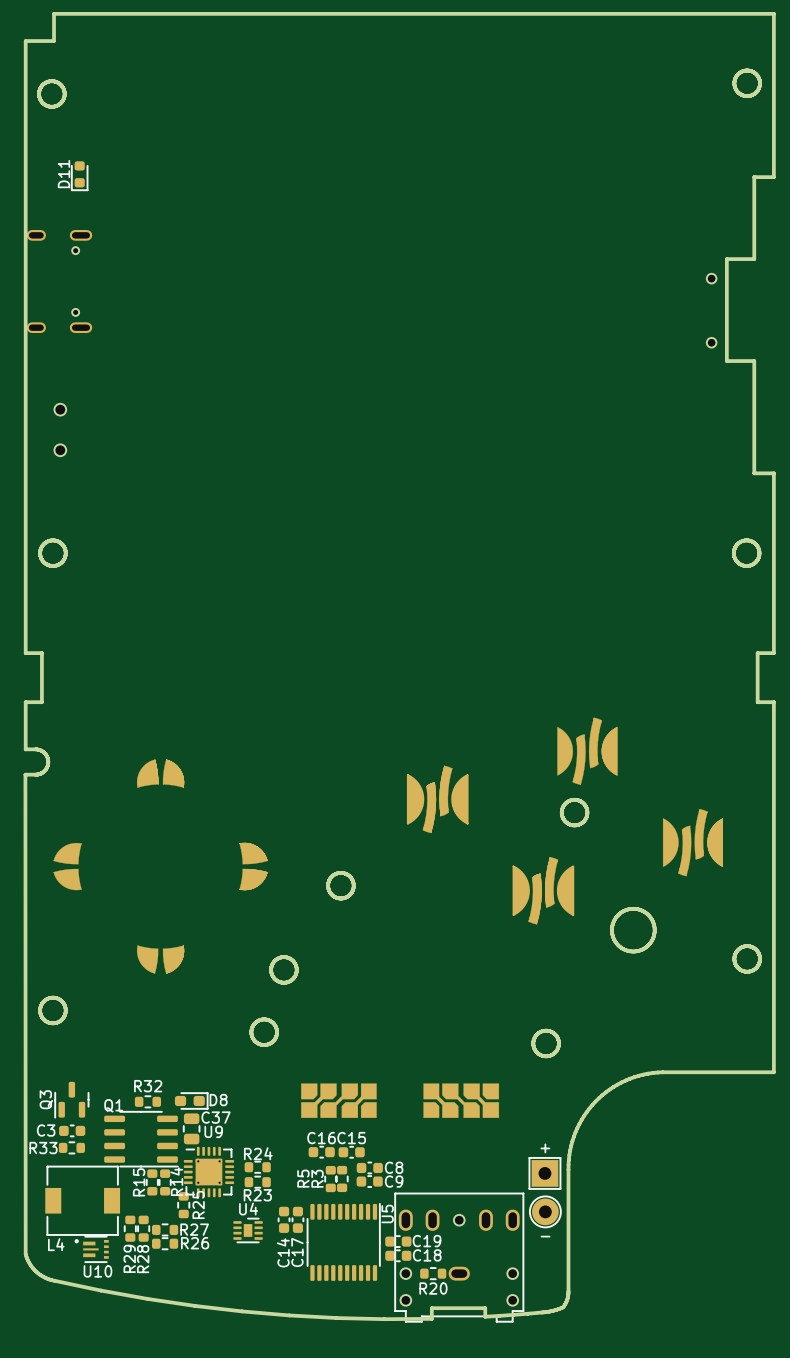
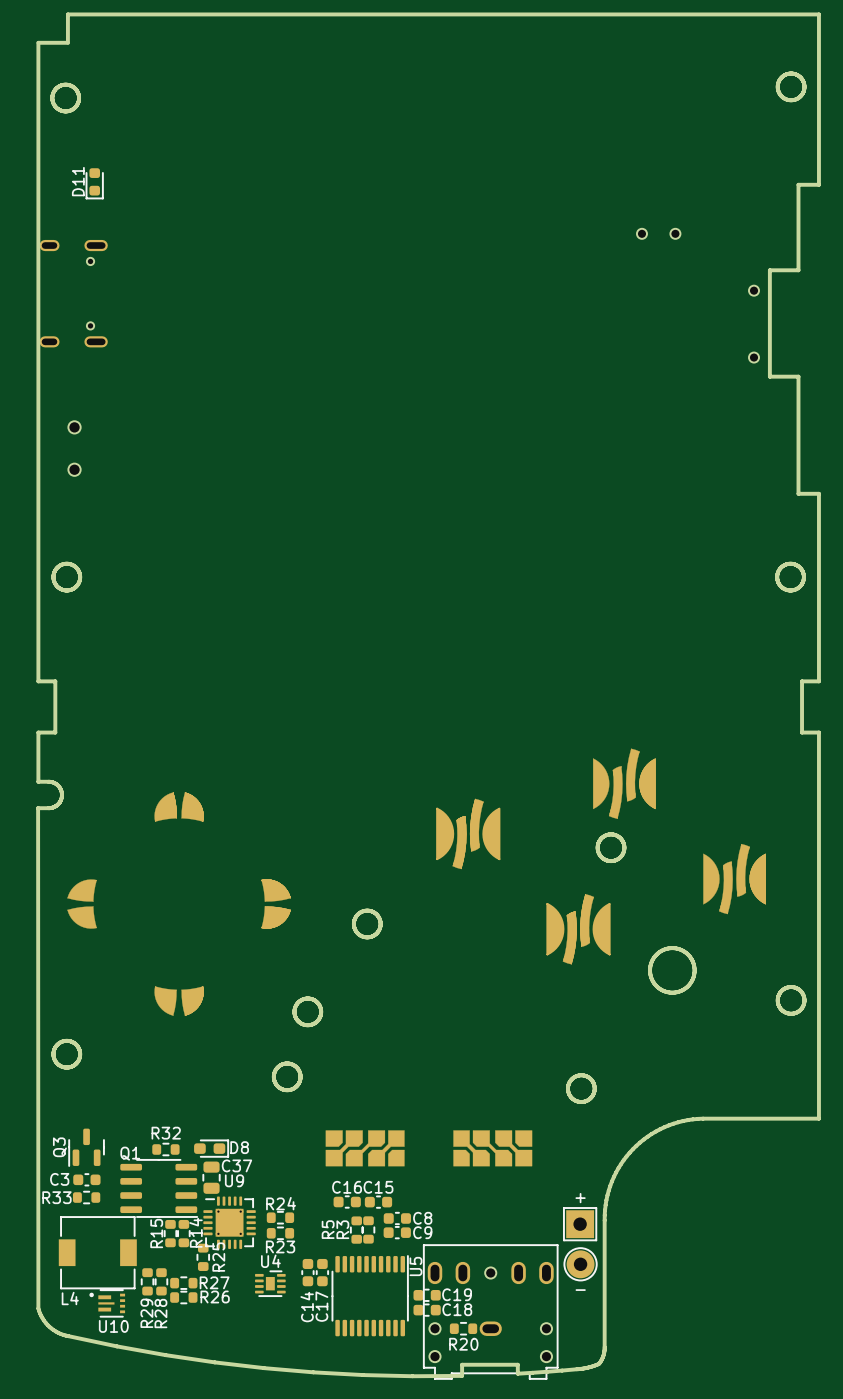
part: none -> (658, 233)

